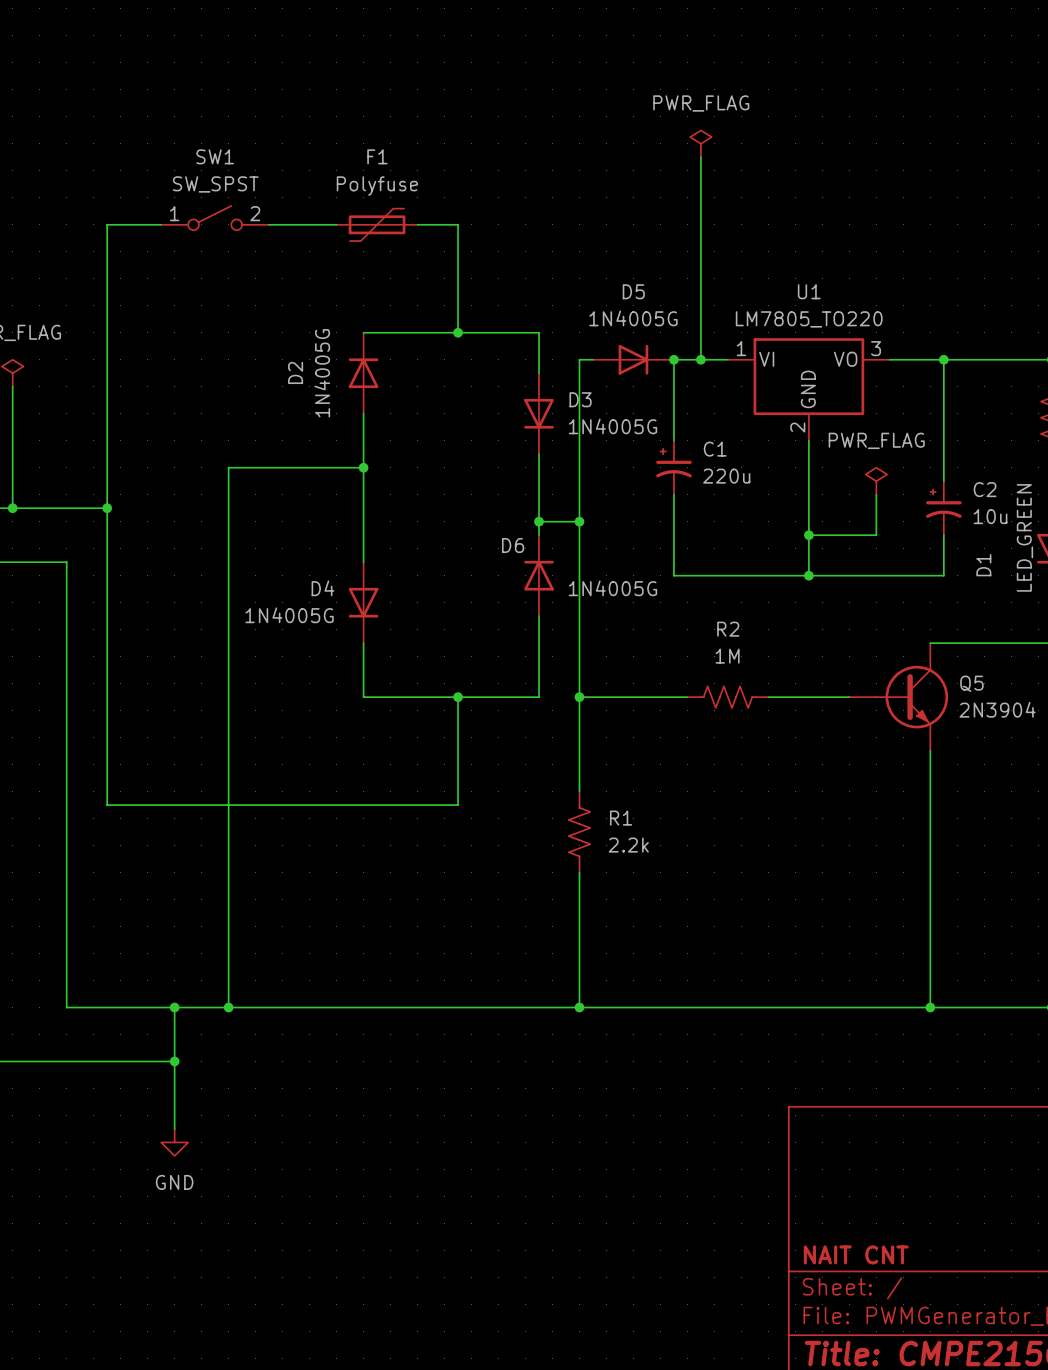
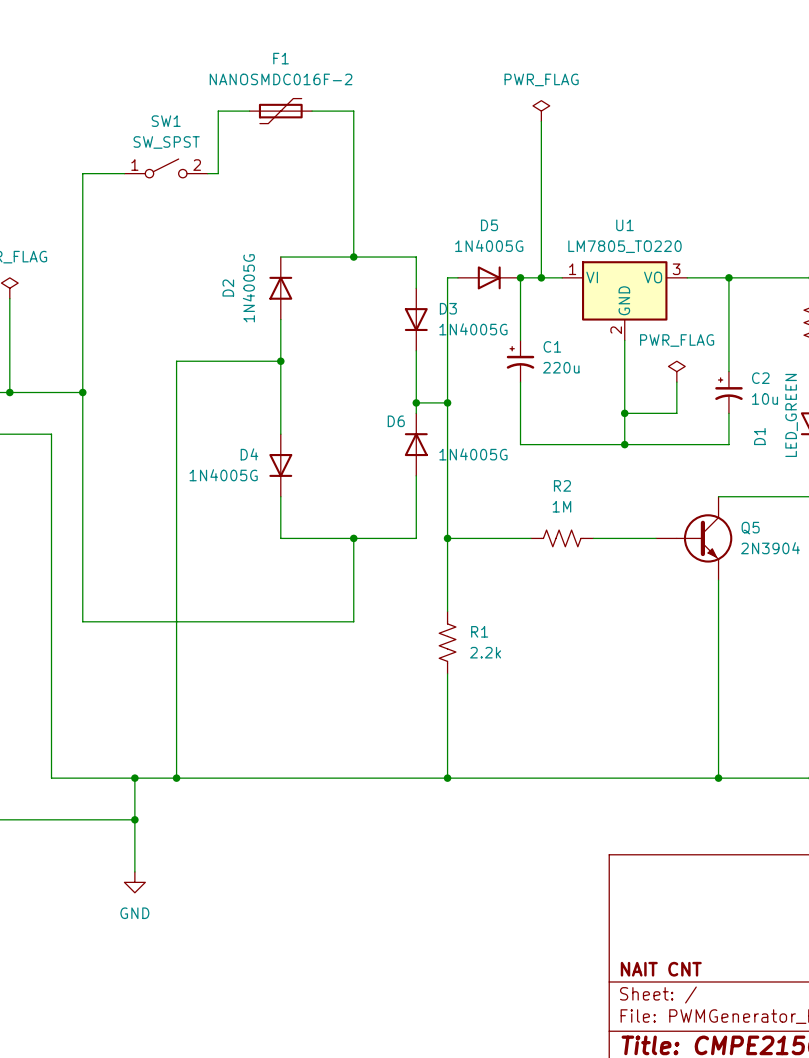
F1 value: Polyfuse (377, 186) -> NANOSMDC016F-2 (281, 79)
wire: (282, 224) (336, 224) -> (218, 173) (218, 111) (249, 111)
F1 position: (377, 224) -> (280, 111)
wire: (417, 224) (458, 224) -> (312, 111) (353, 111) (353, 173)

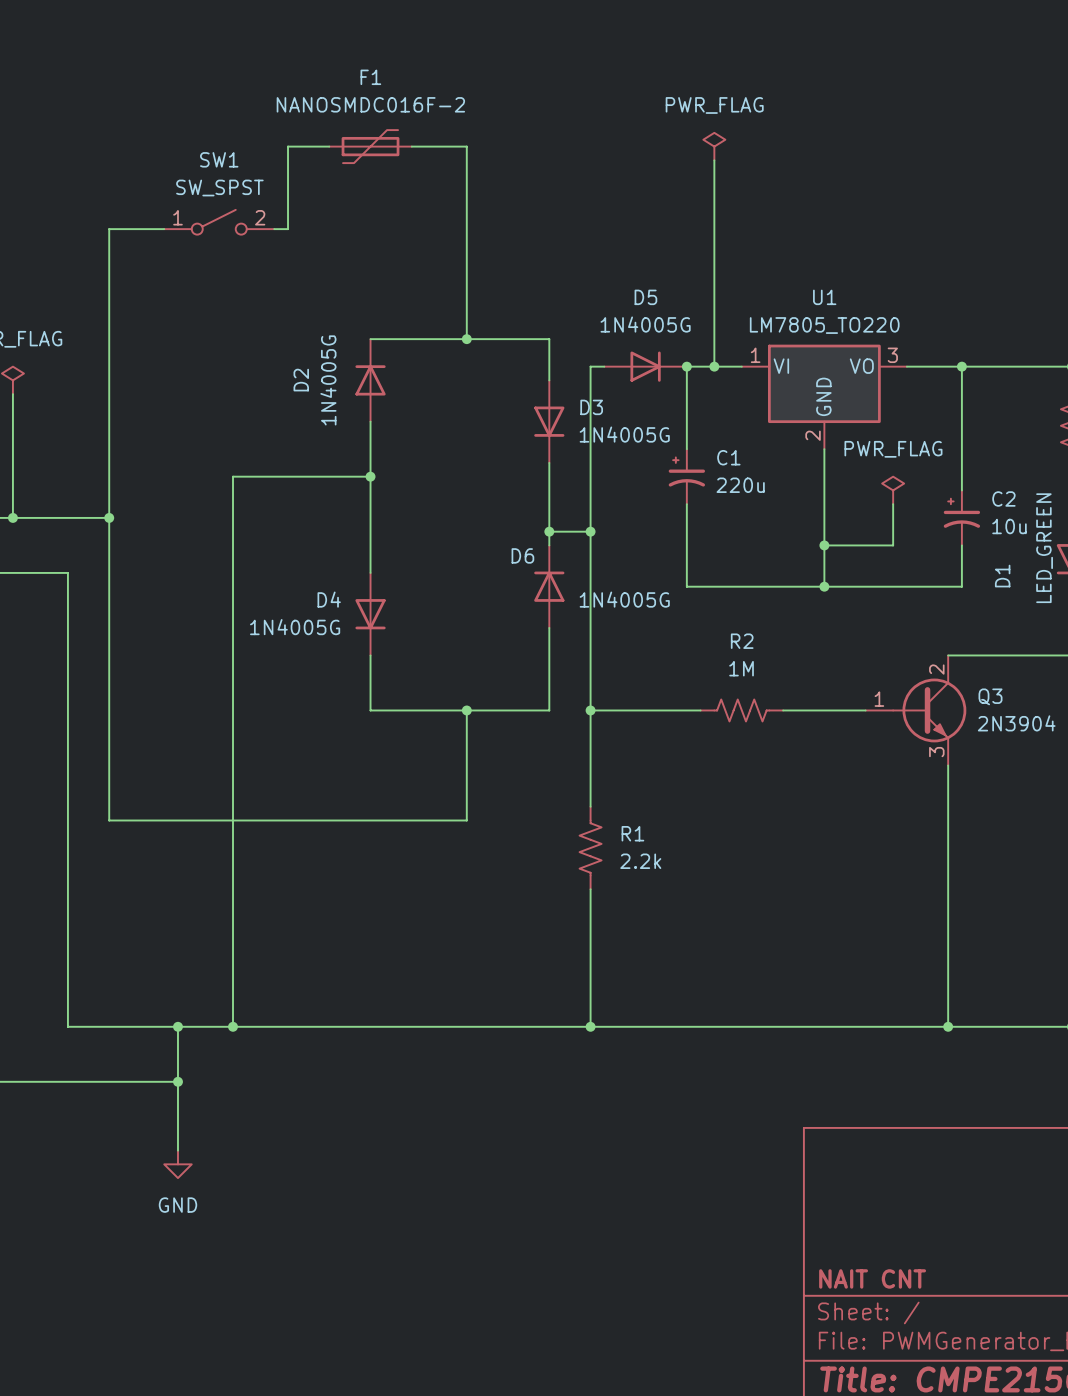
Q5 pin number: none -> 2 (936, 669)
Q5 name: Q5 (750, 528) -> Q3 (990, 696)
Q5 pin number: none -> 1 (879, 699)
Q5 pin number: none -> 3 (936, 752)

